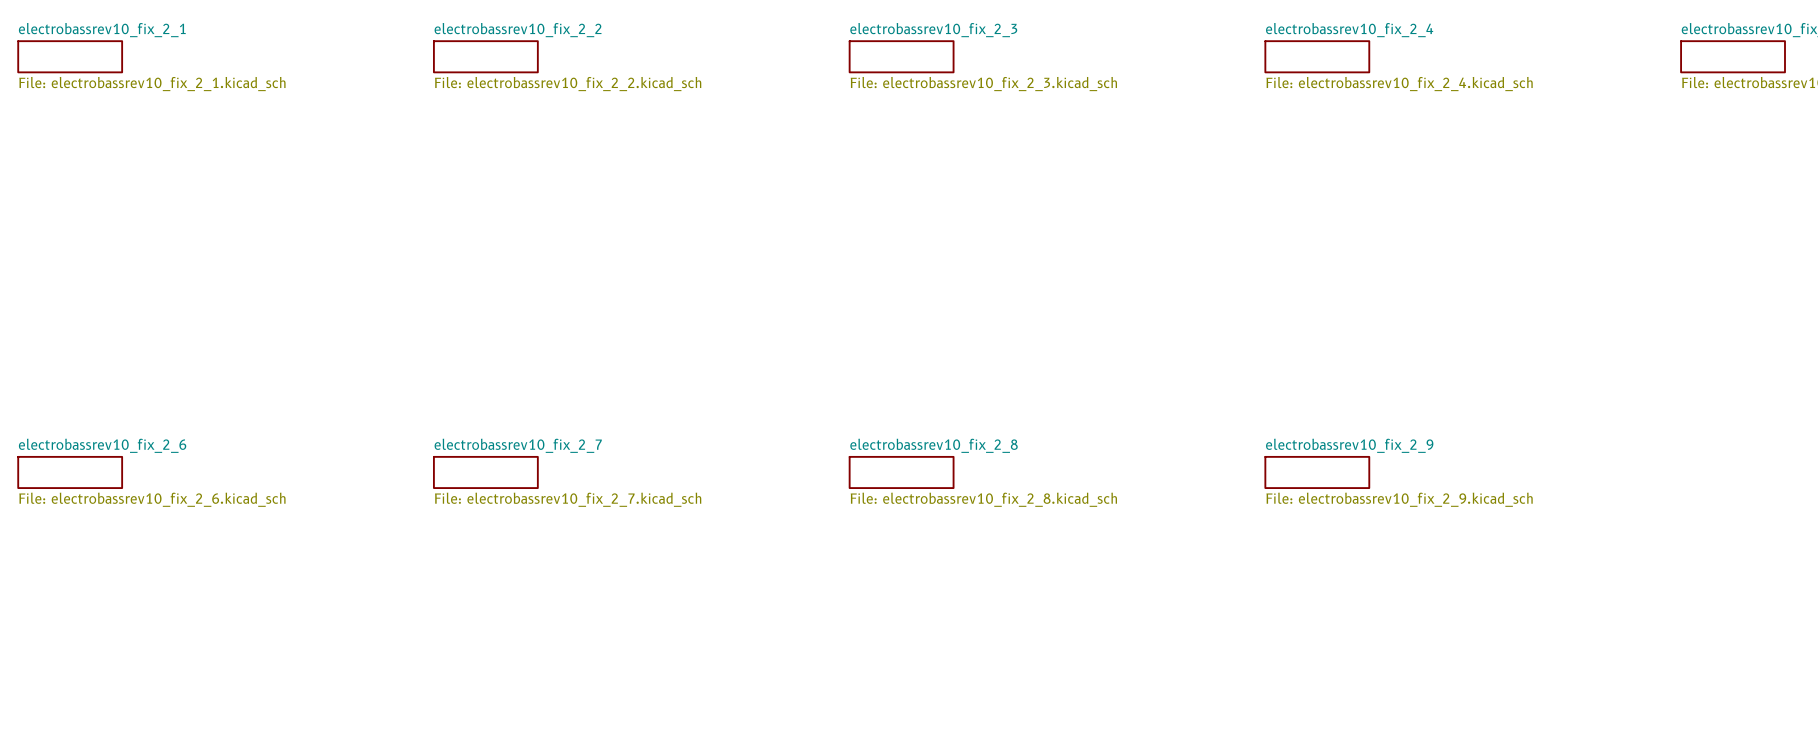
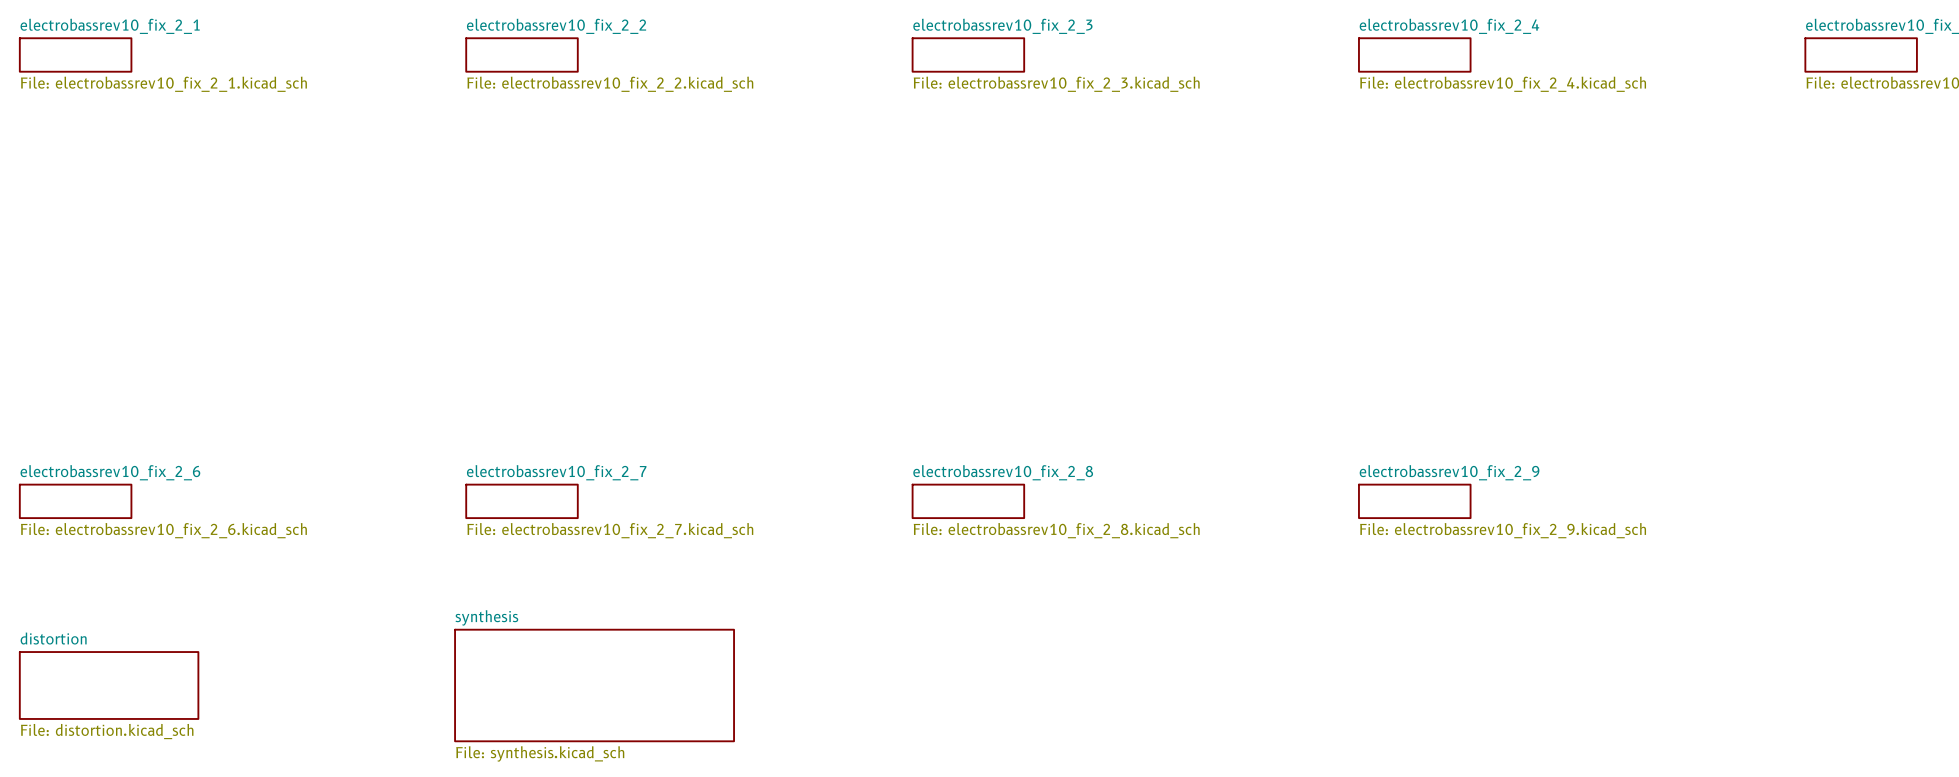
sheet distortion: none -> File: distortion.kicad_sch (109, 685)
sheet synthesis: none -> File: synthesis.kicad_sch (594, 685)

